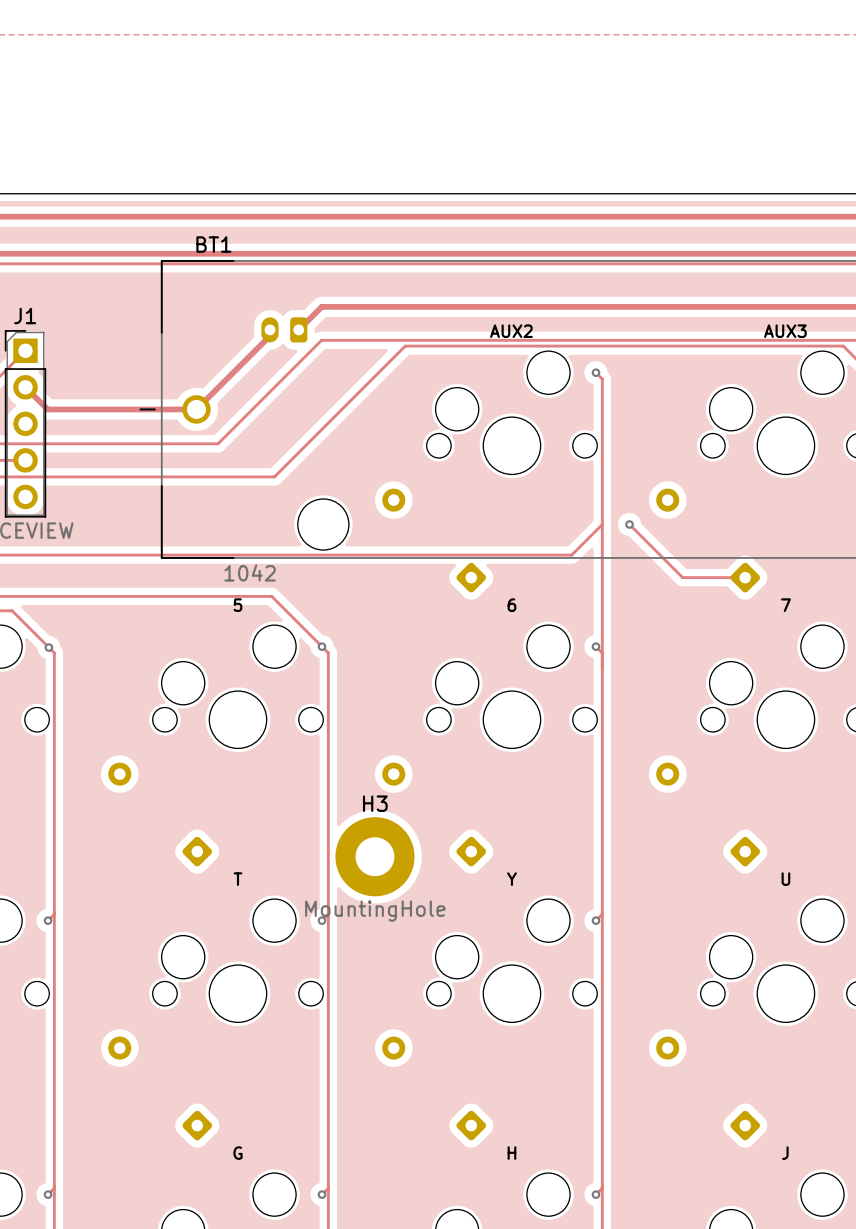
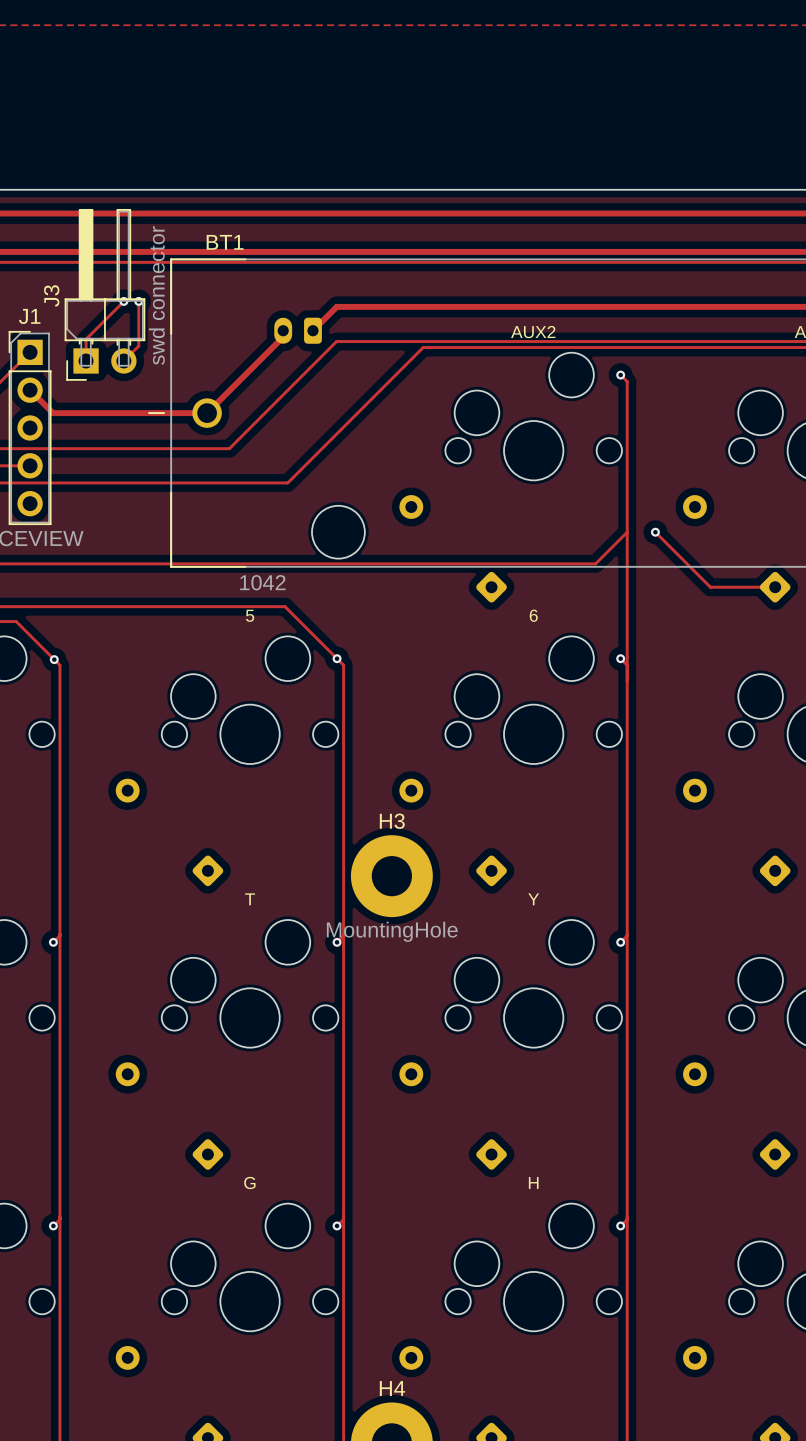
J3: none -> swd connector (104, 294)
track: none -> (123, 301) (86, 339) (86, 360)
via: none -> (123, 301)
track: none -> (138, 301) (138, 346) (123, 360)
via: none -> (138, 301)

